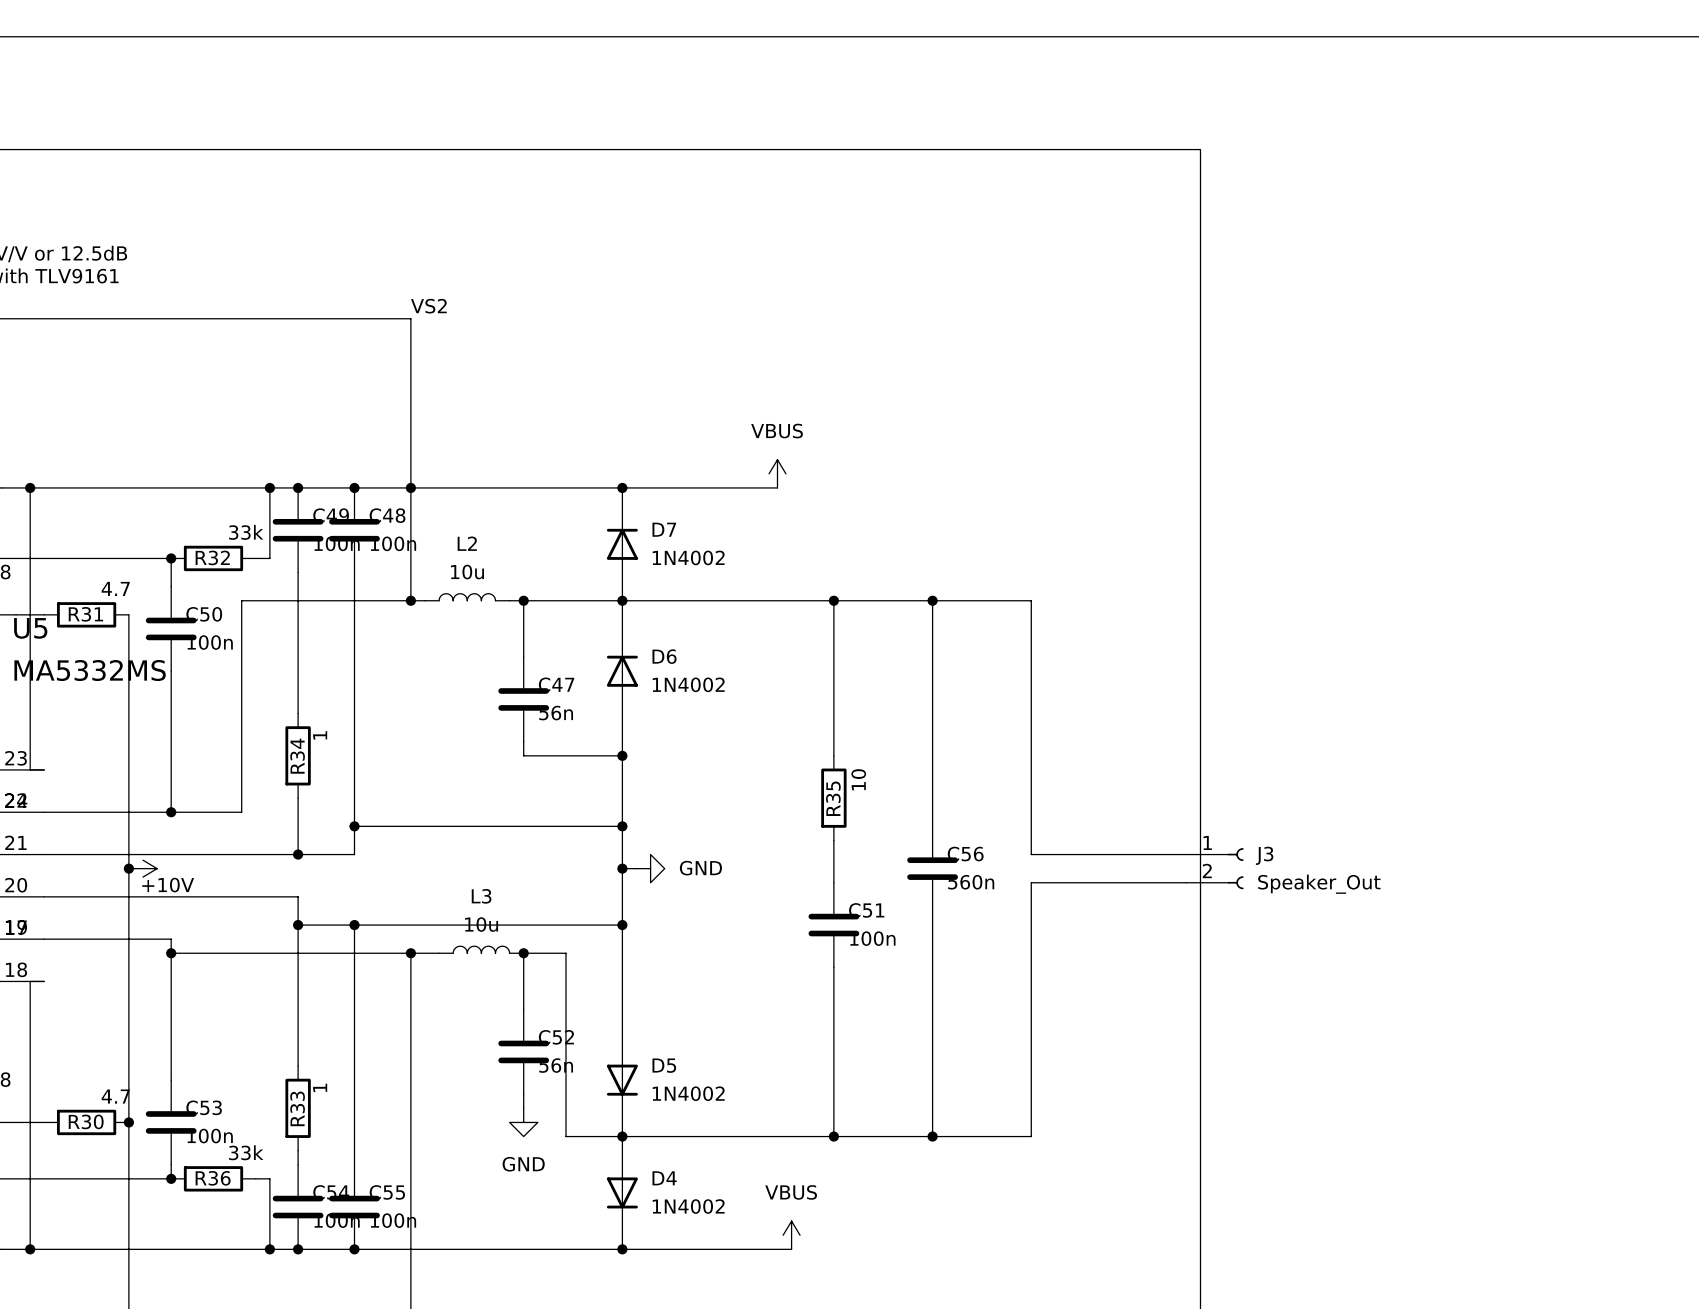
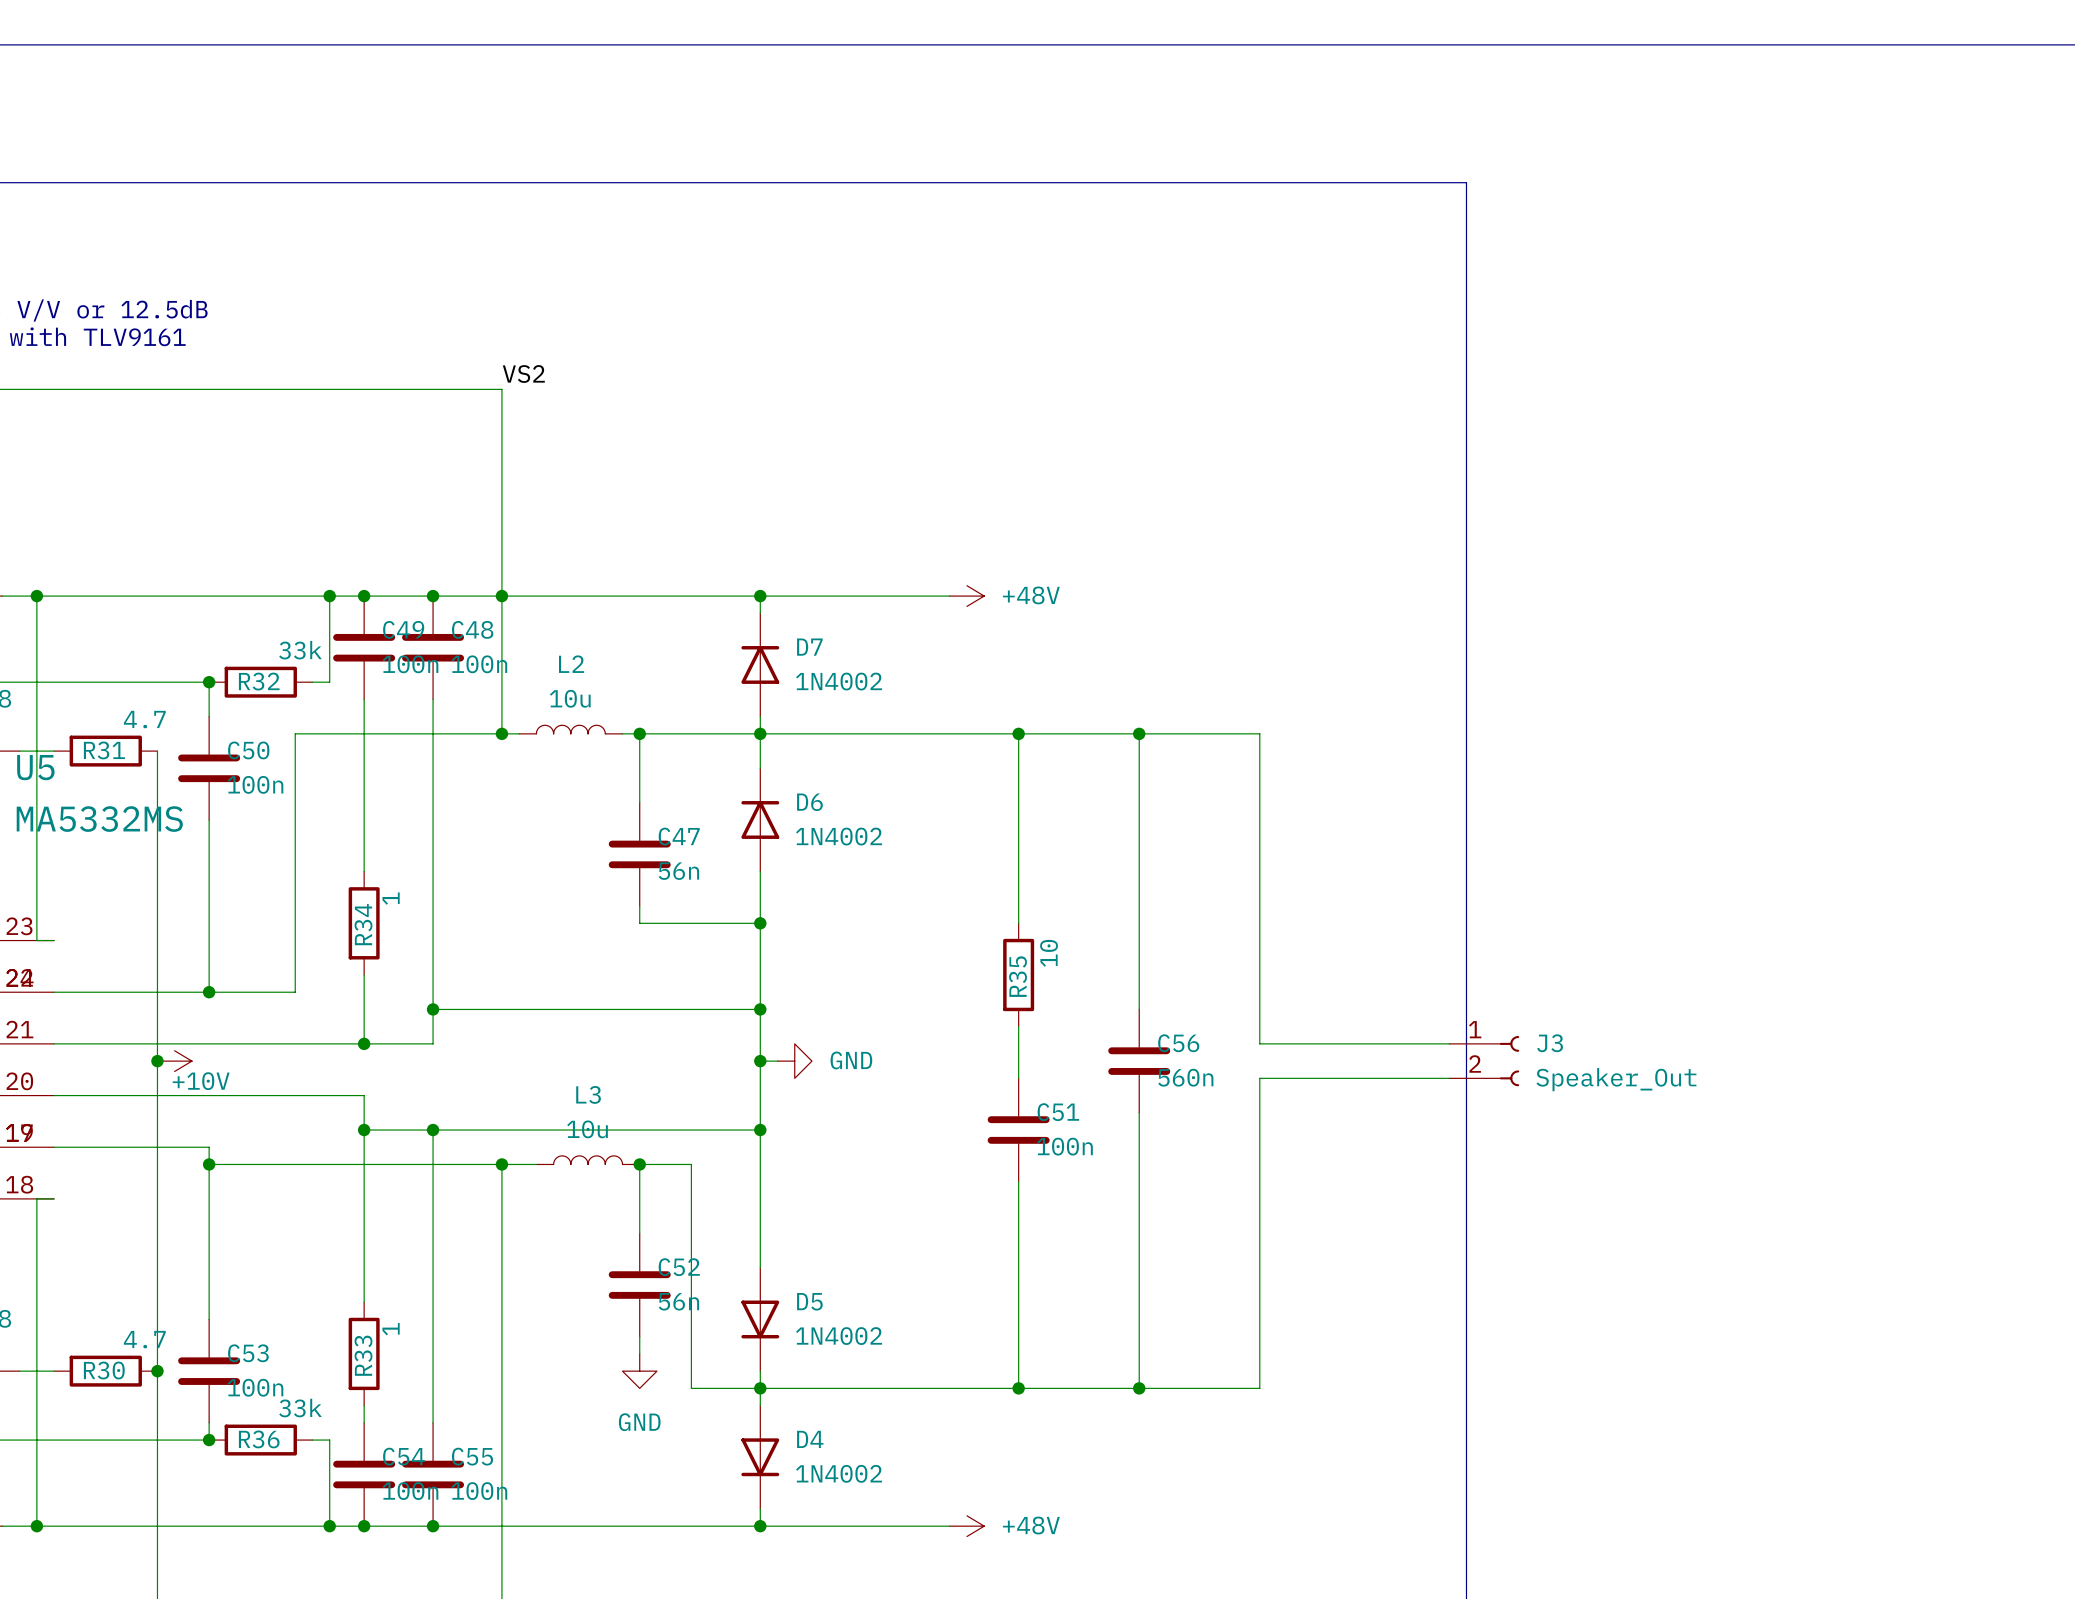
power symbol: VBUS (777, 473) -> none
power symbol: none -> +48V (966, 596)
power symbol: VBUS (791, 1235) -> none
power symbol: none -> +48V (966, 1526)

